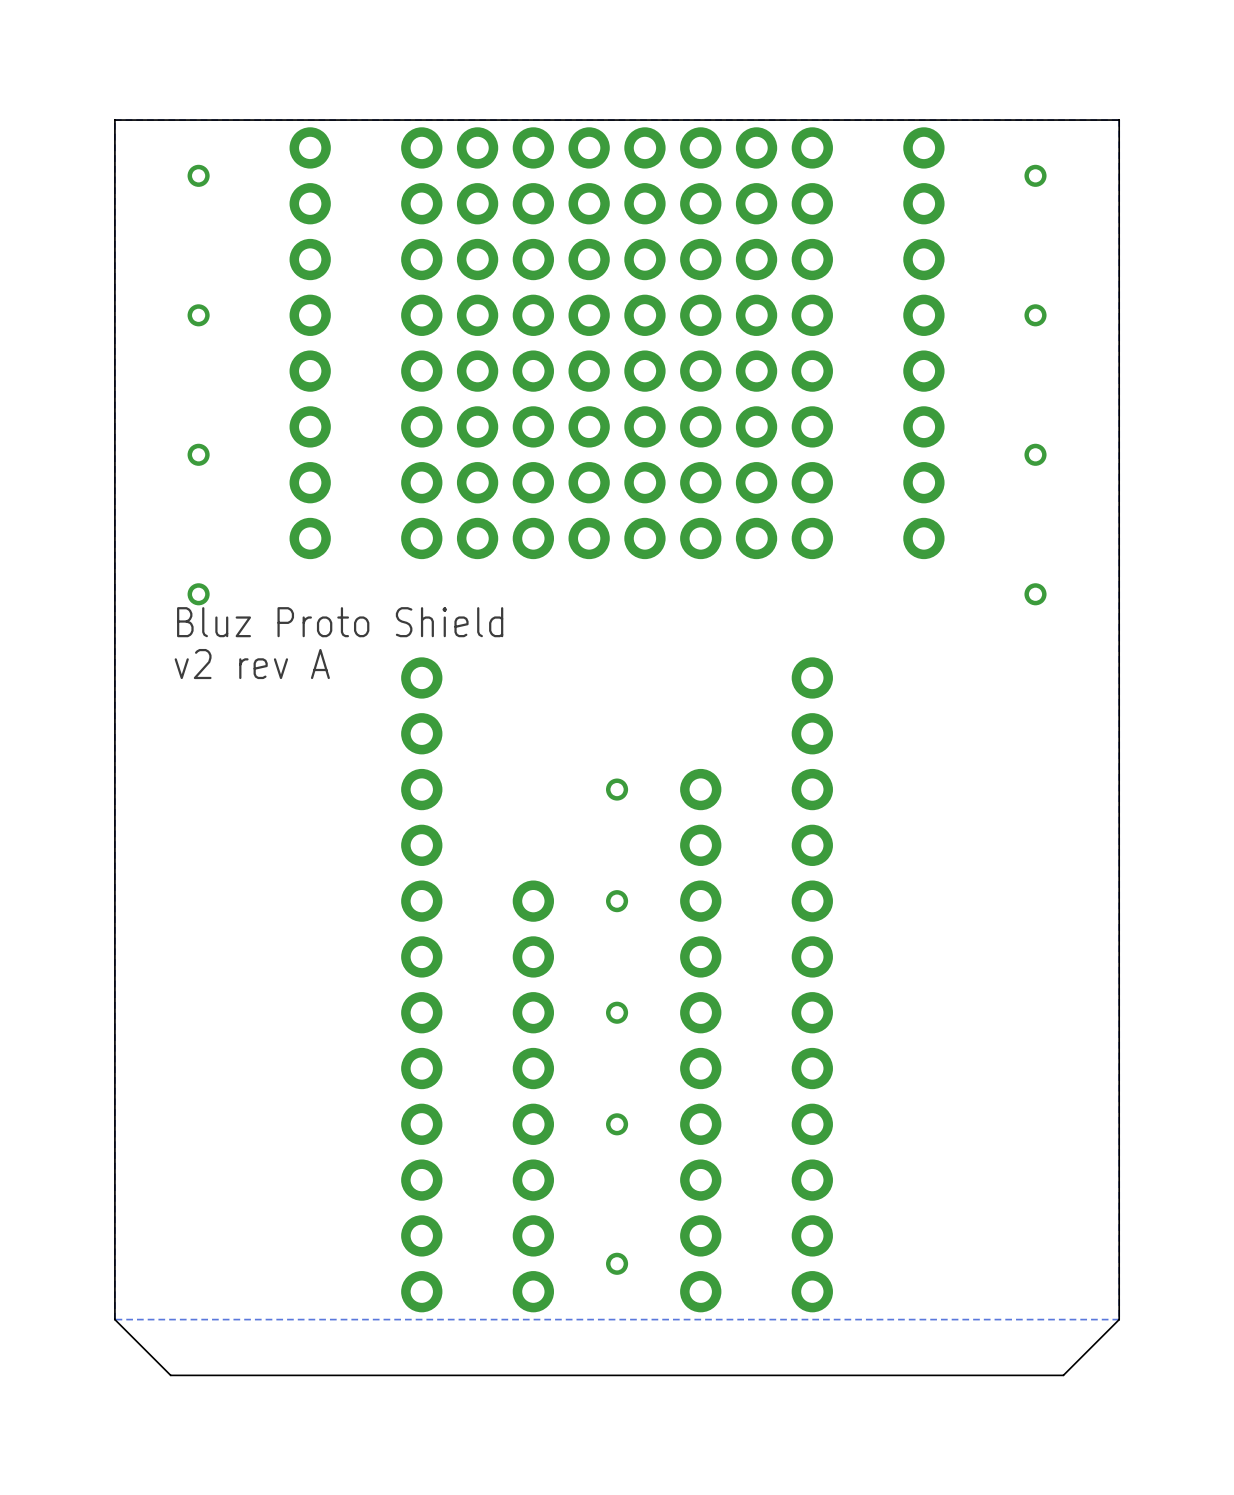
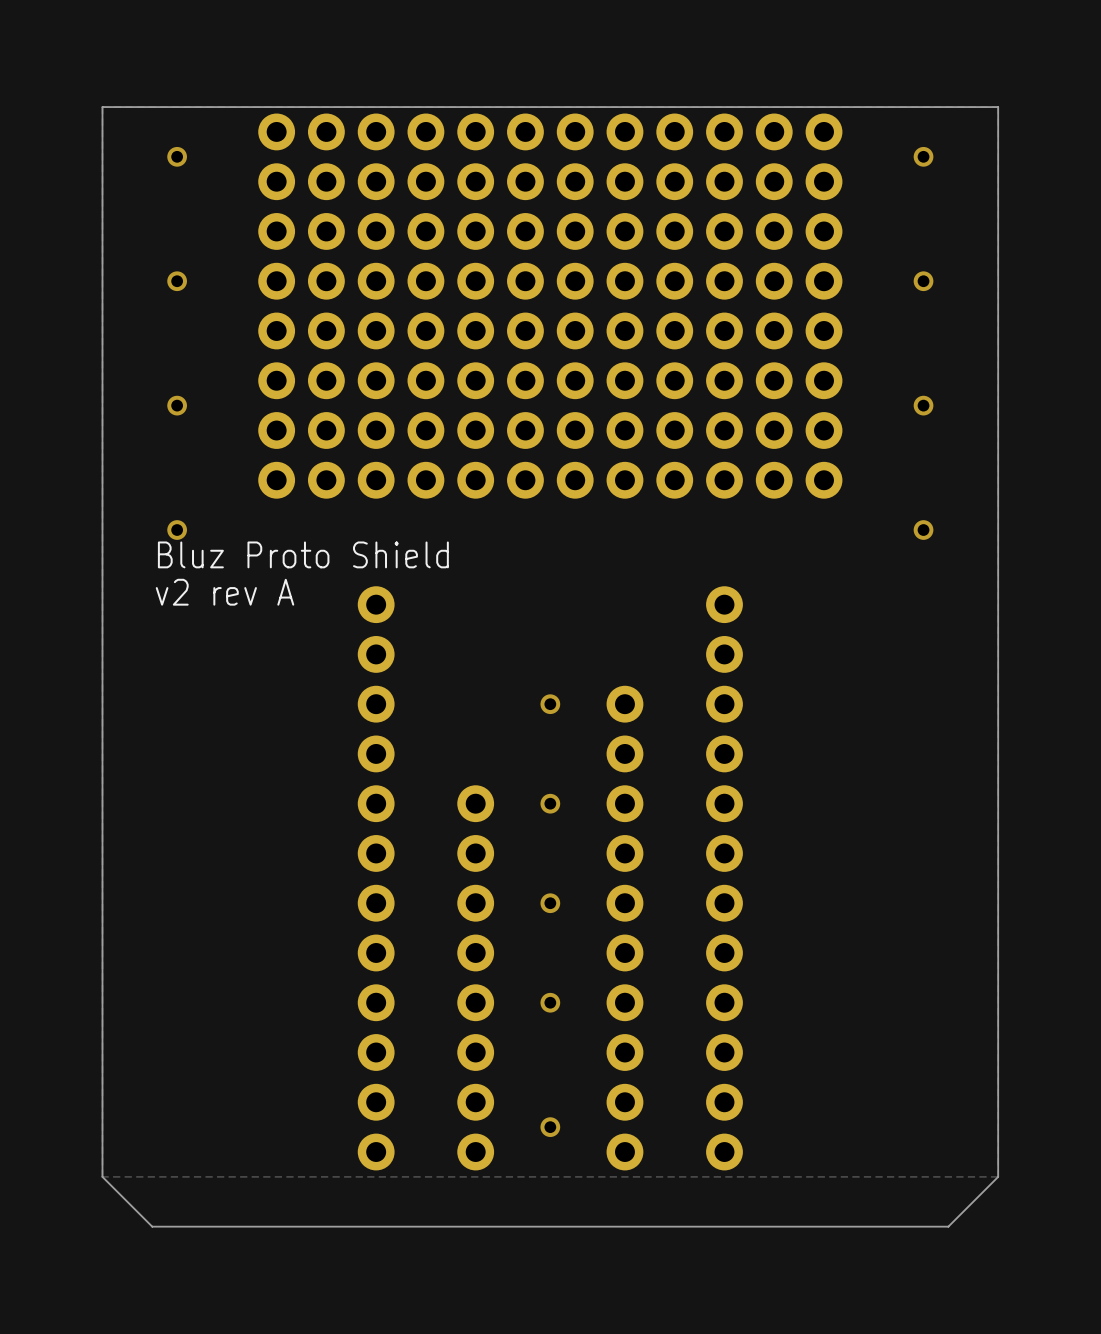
part: none -> (326, 306)
part: none -> (774, 306)

